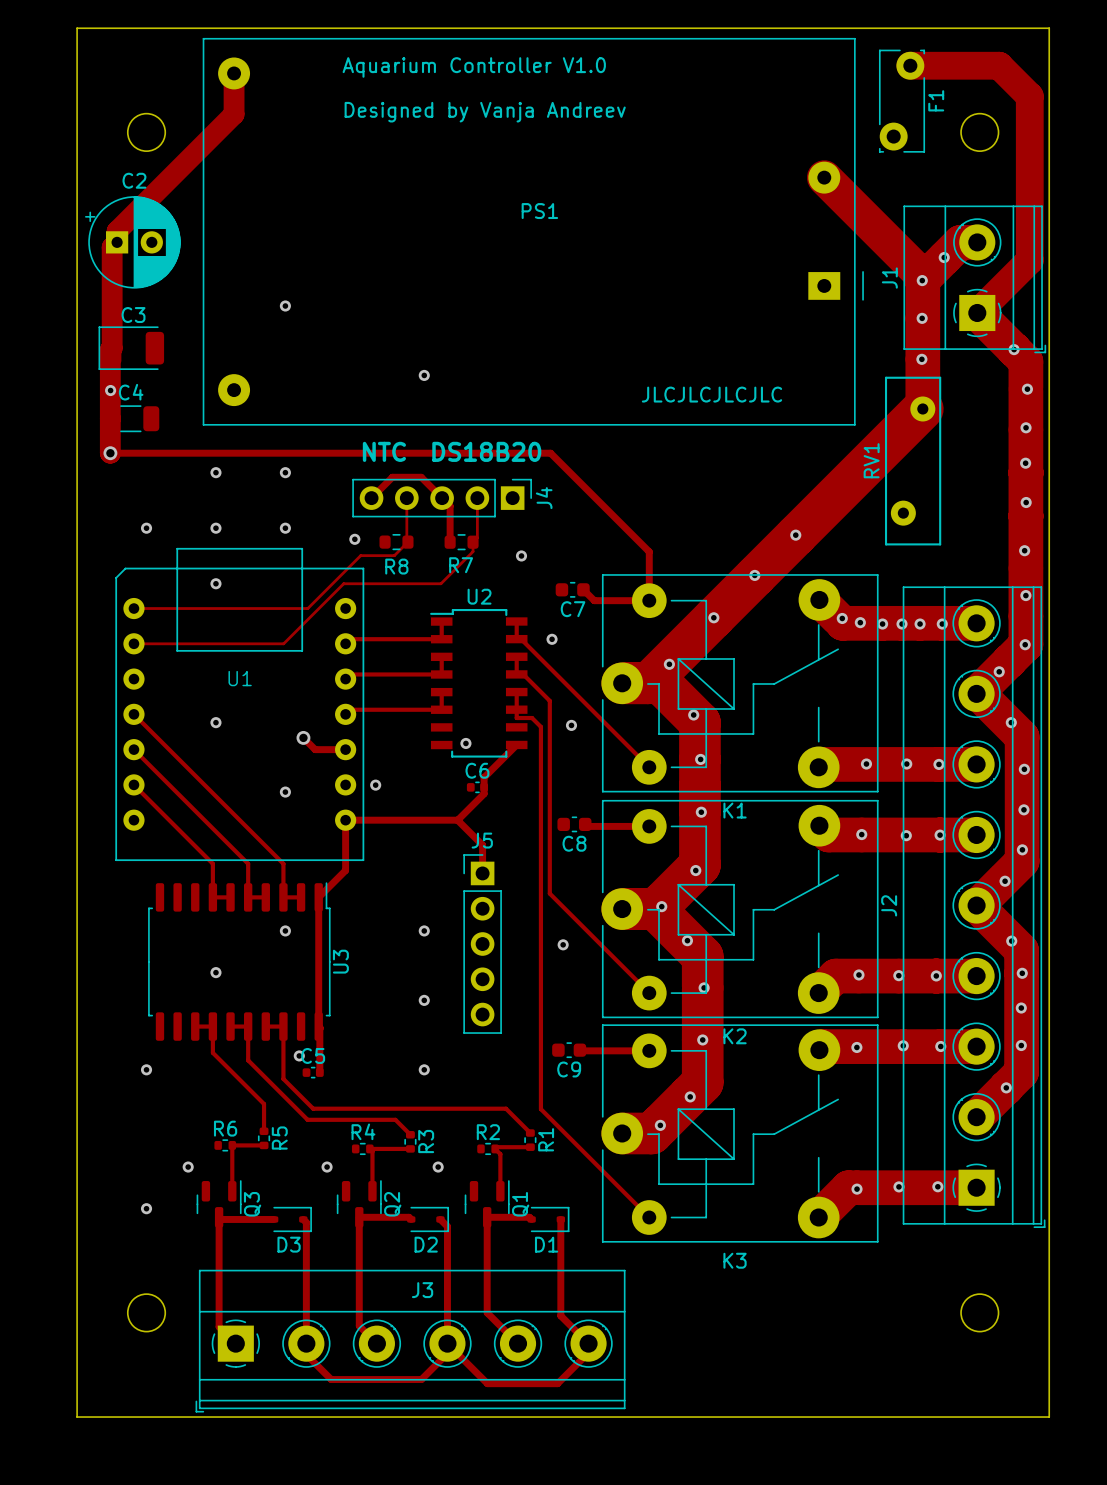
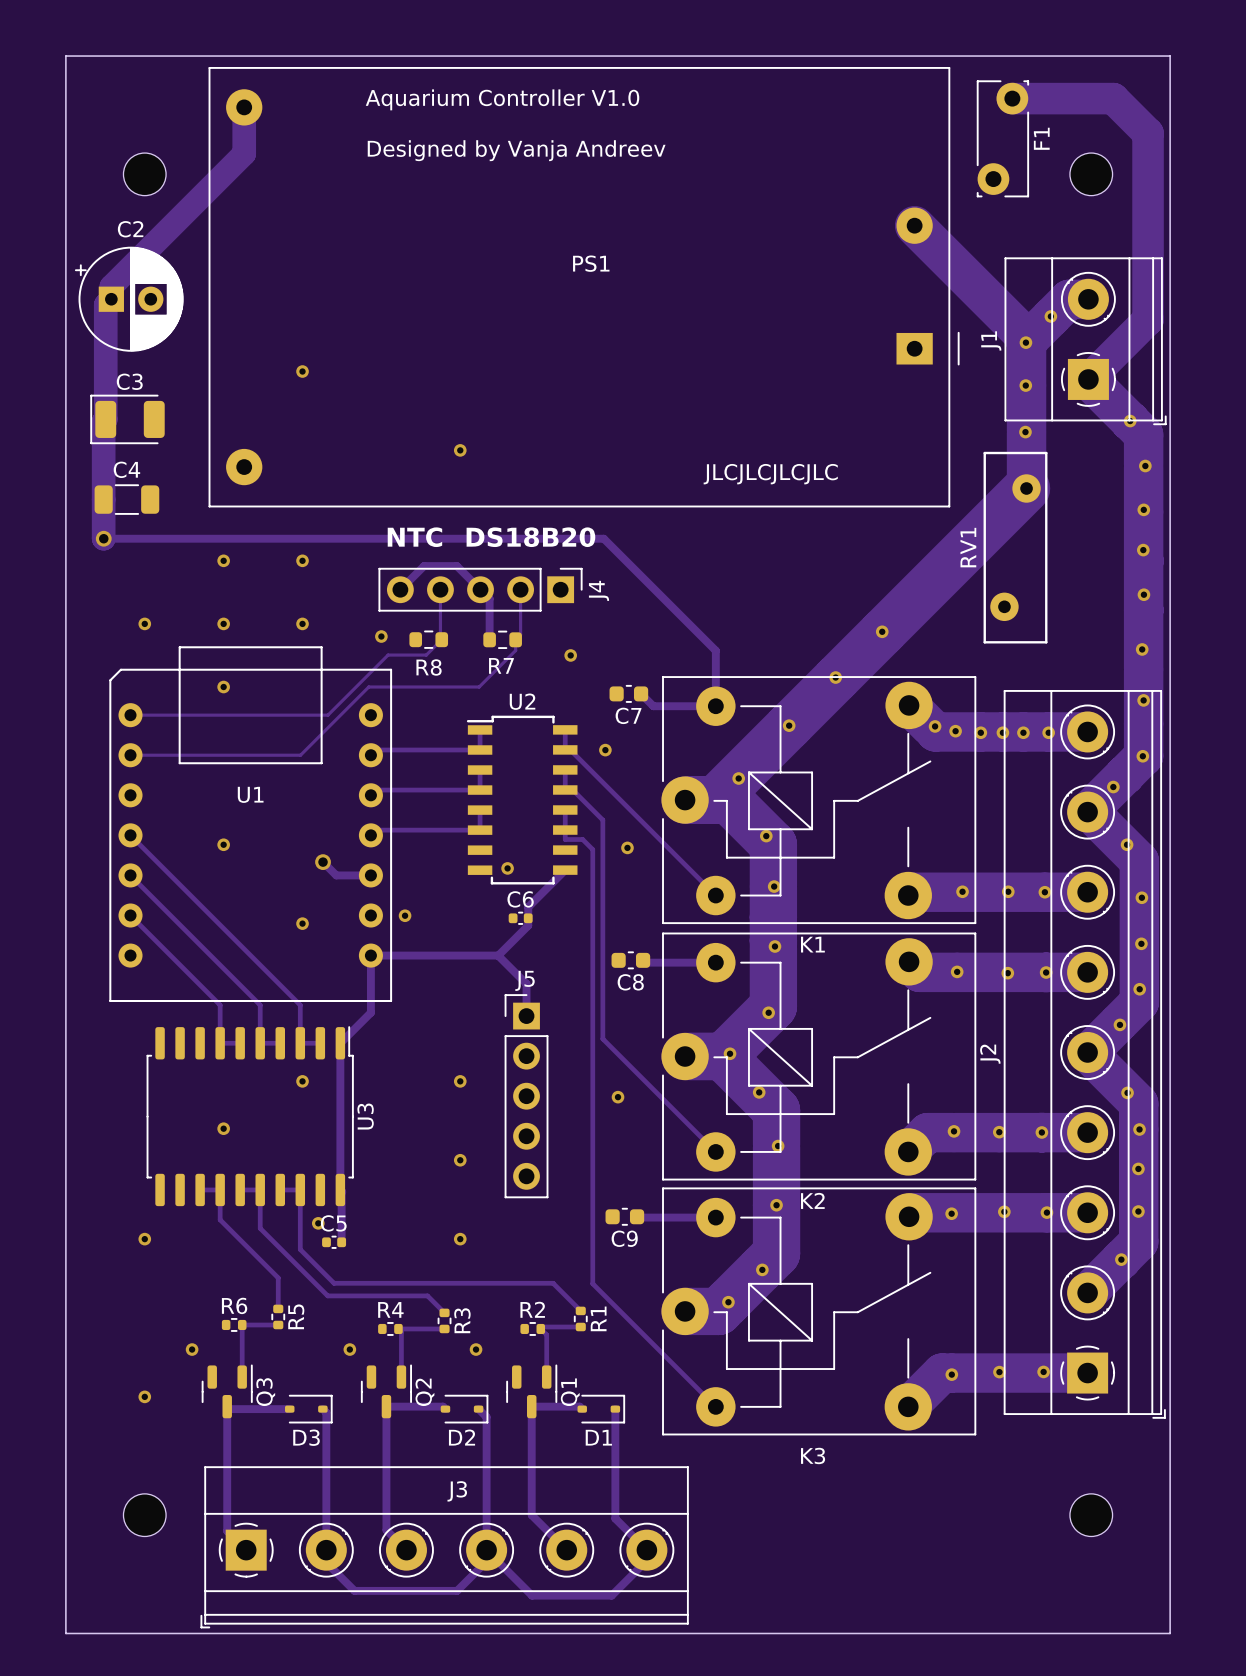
via: (110, 390) -> none

